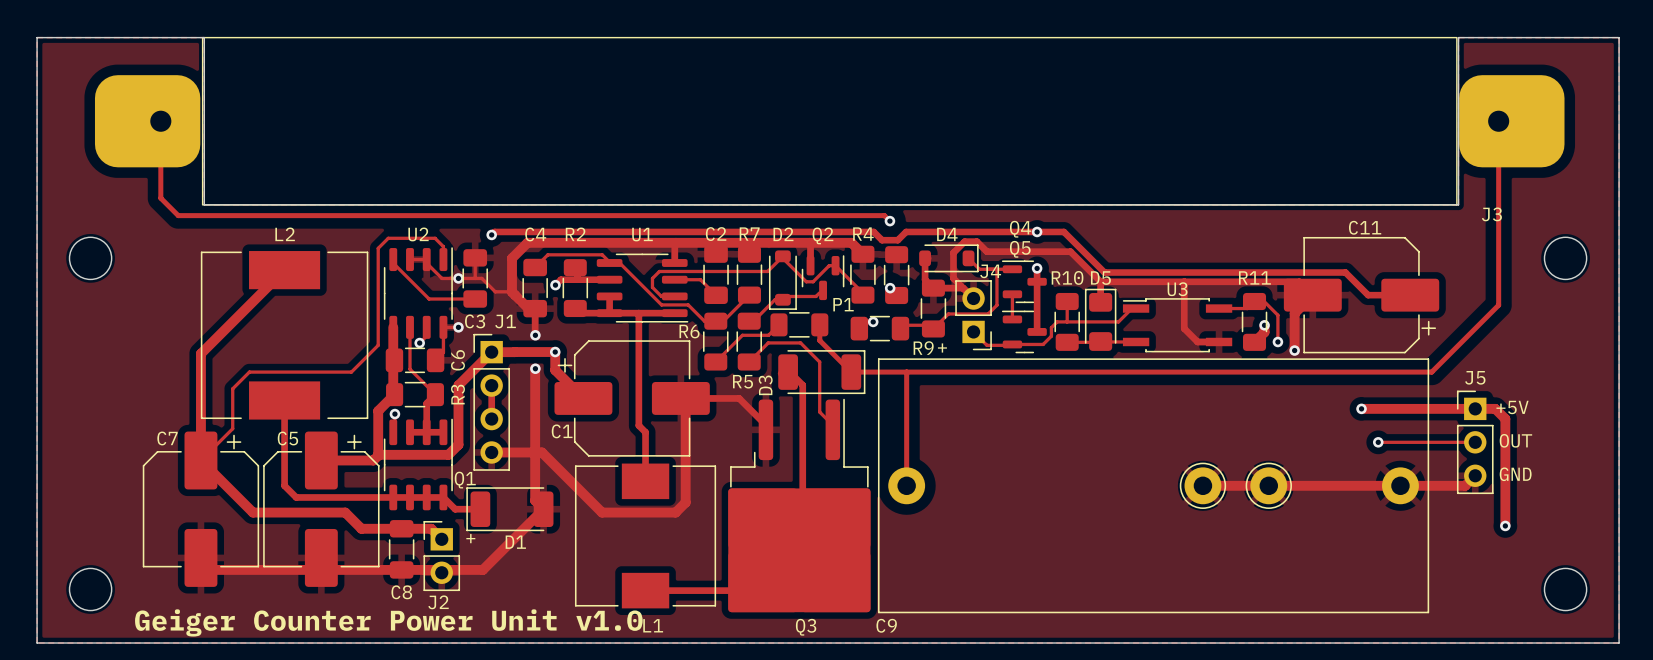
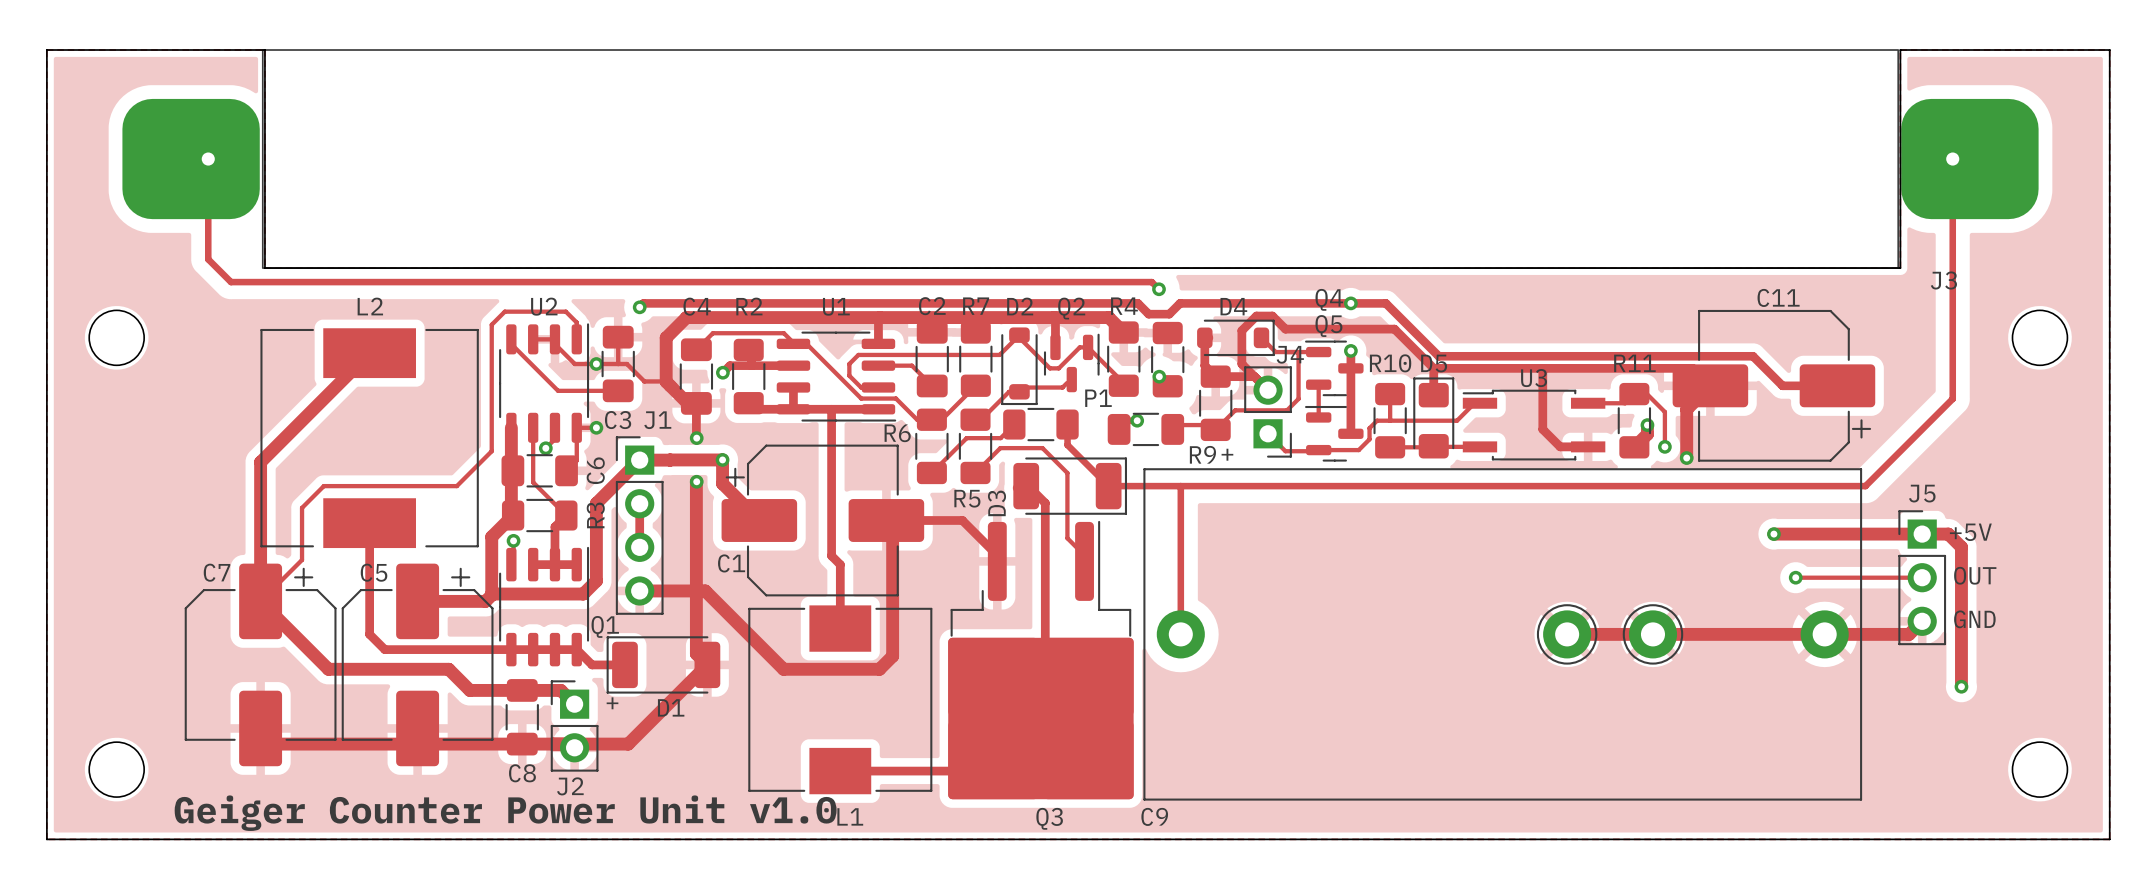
J3 footprint: [94, 36, 1565, 206] -> [122, 49, 2039, 269]

